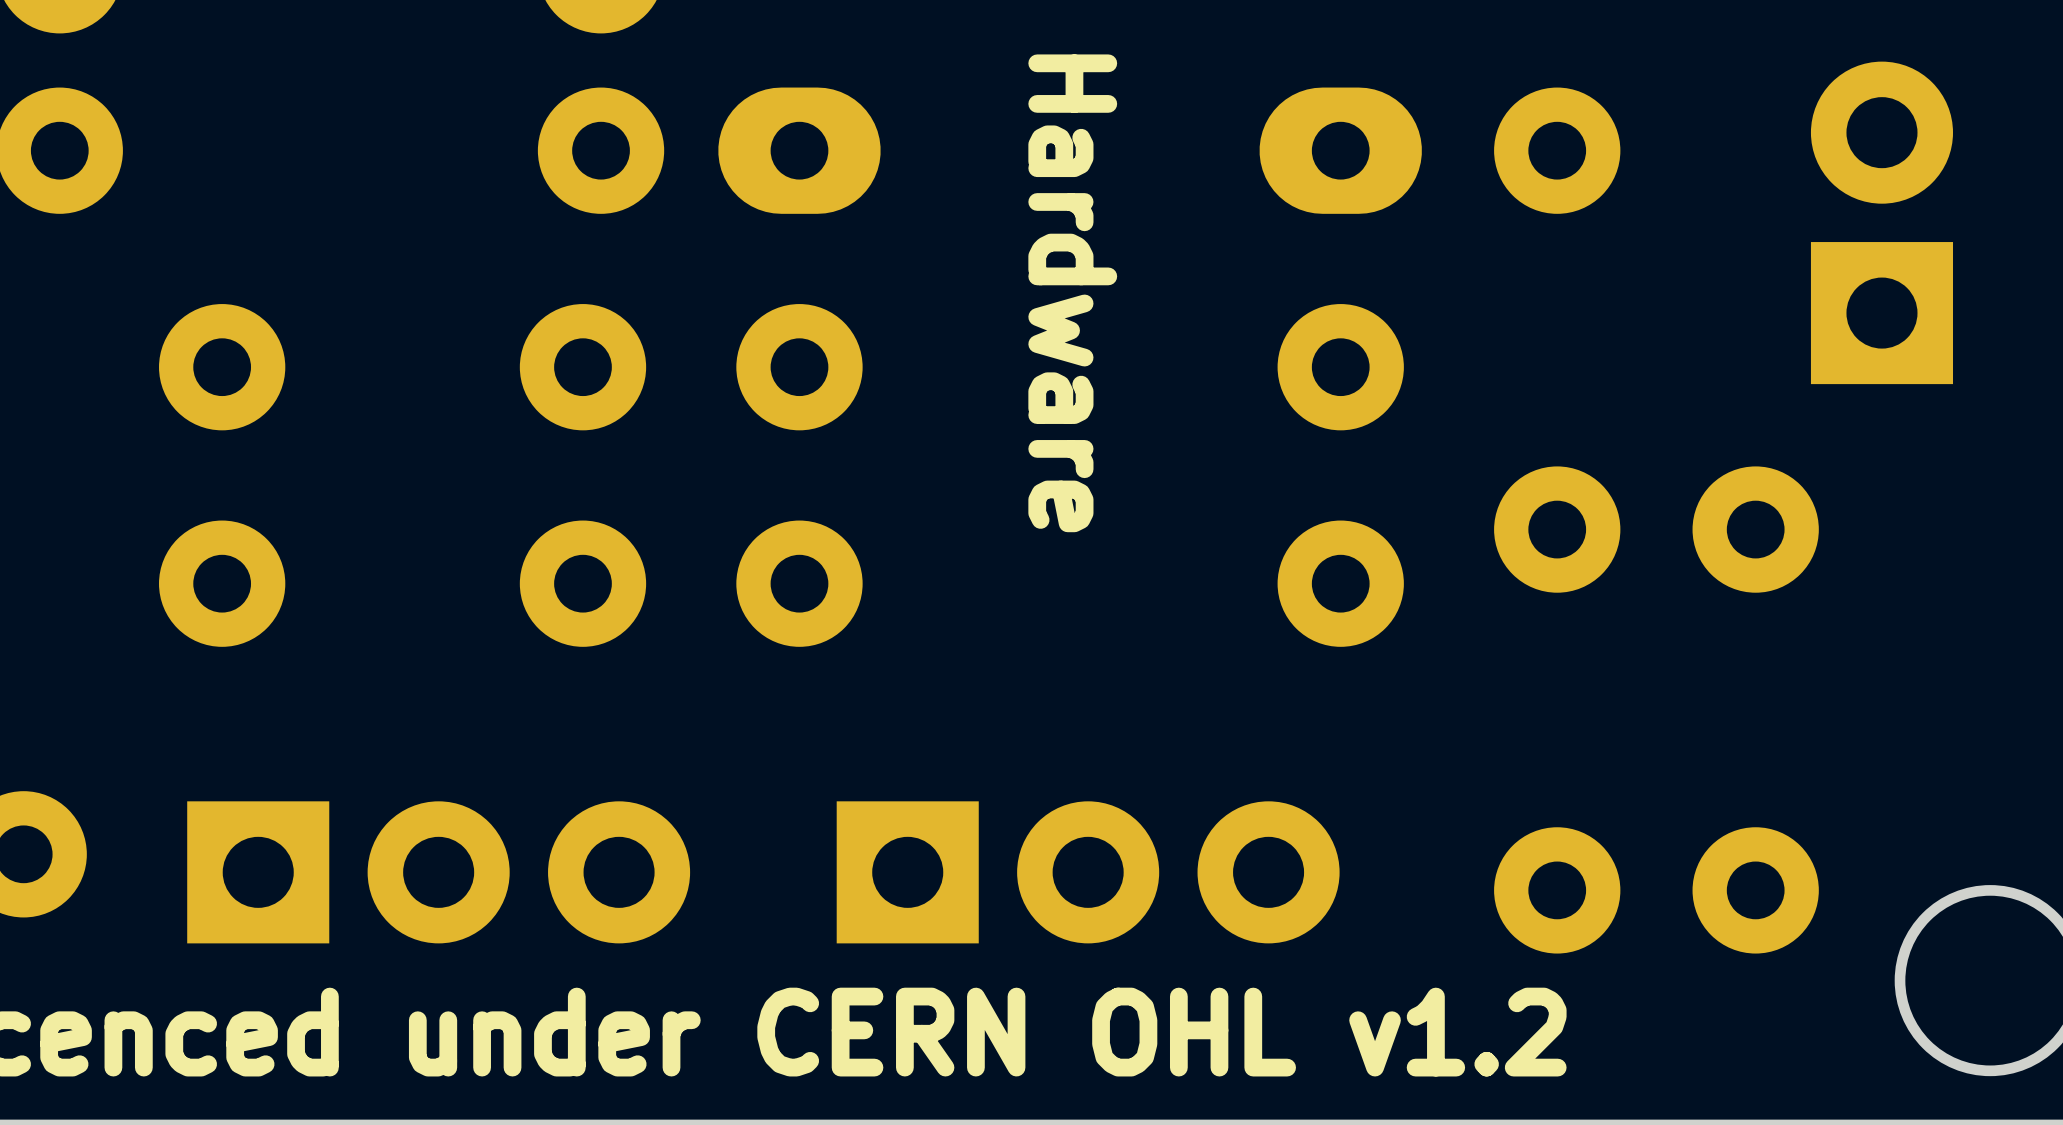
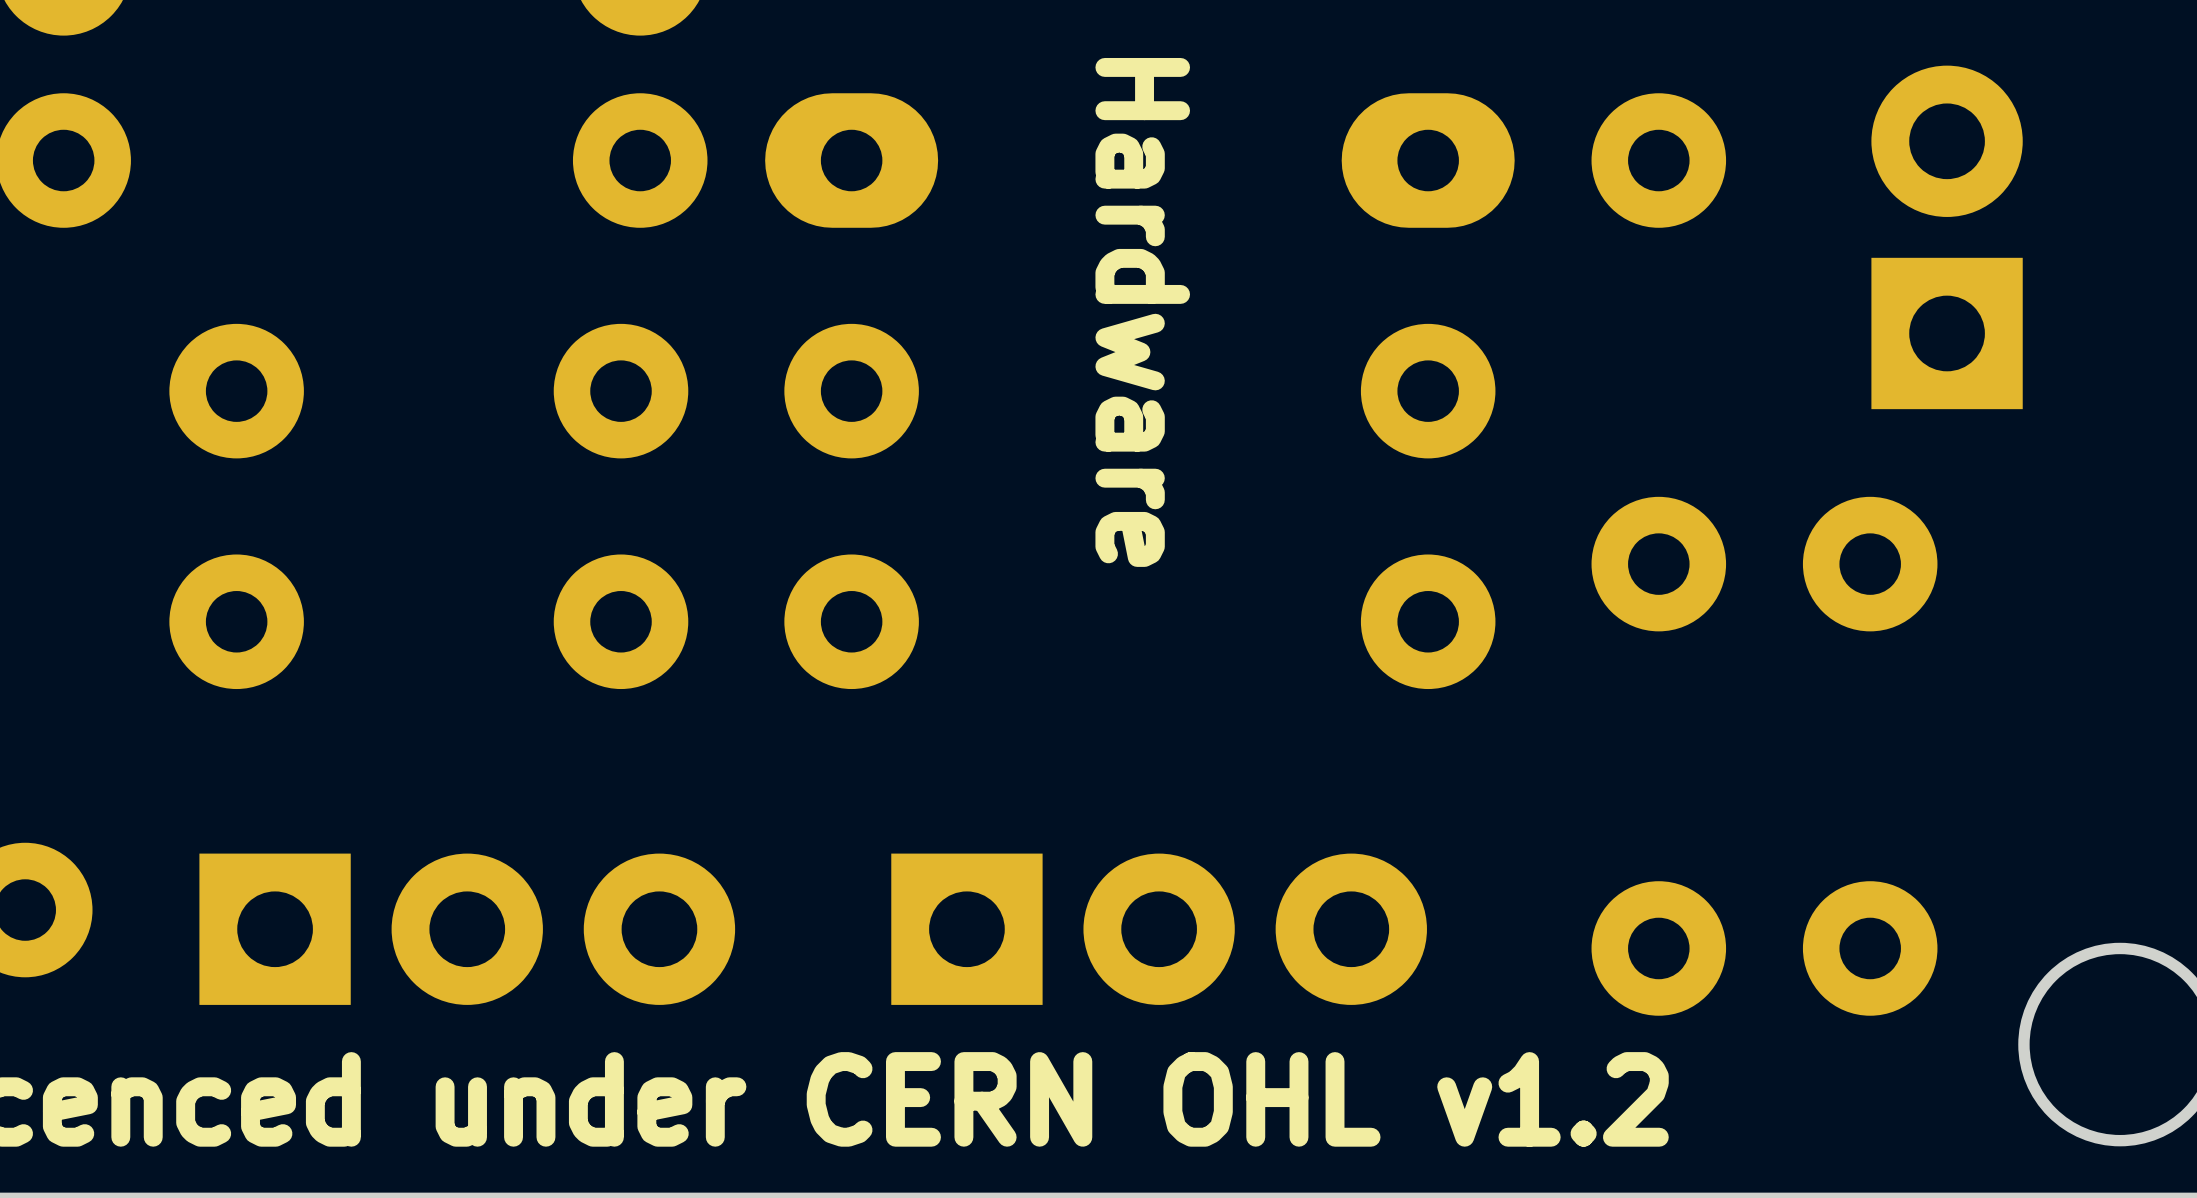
part position: (1881, 222) -> (1947, 237)

